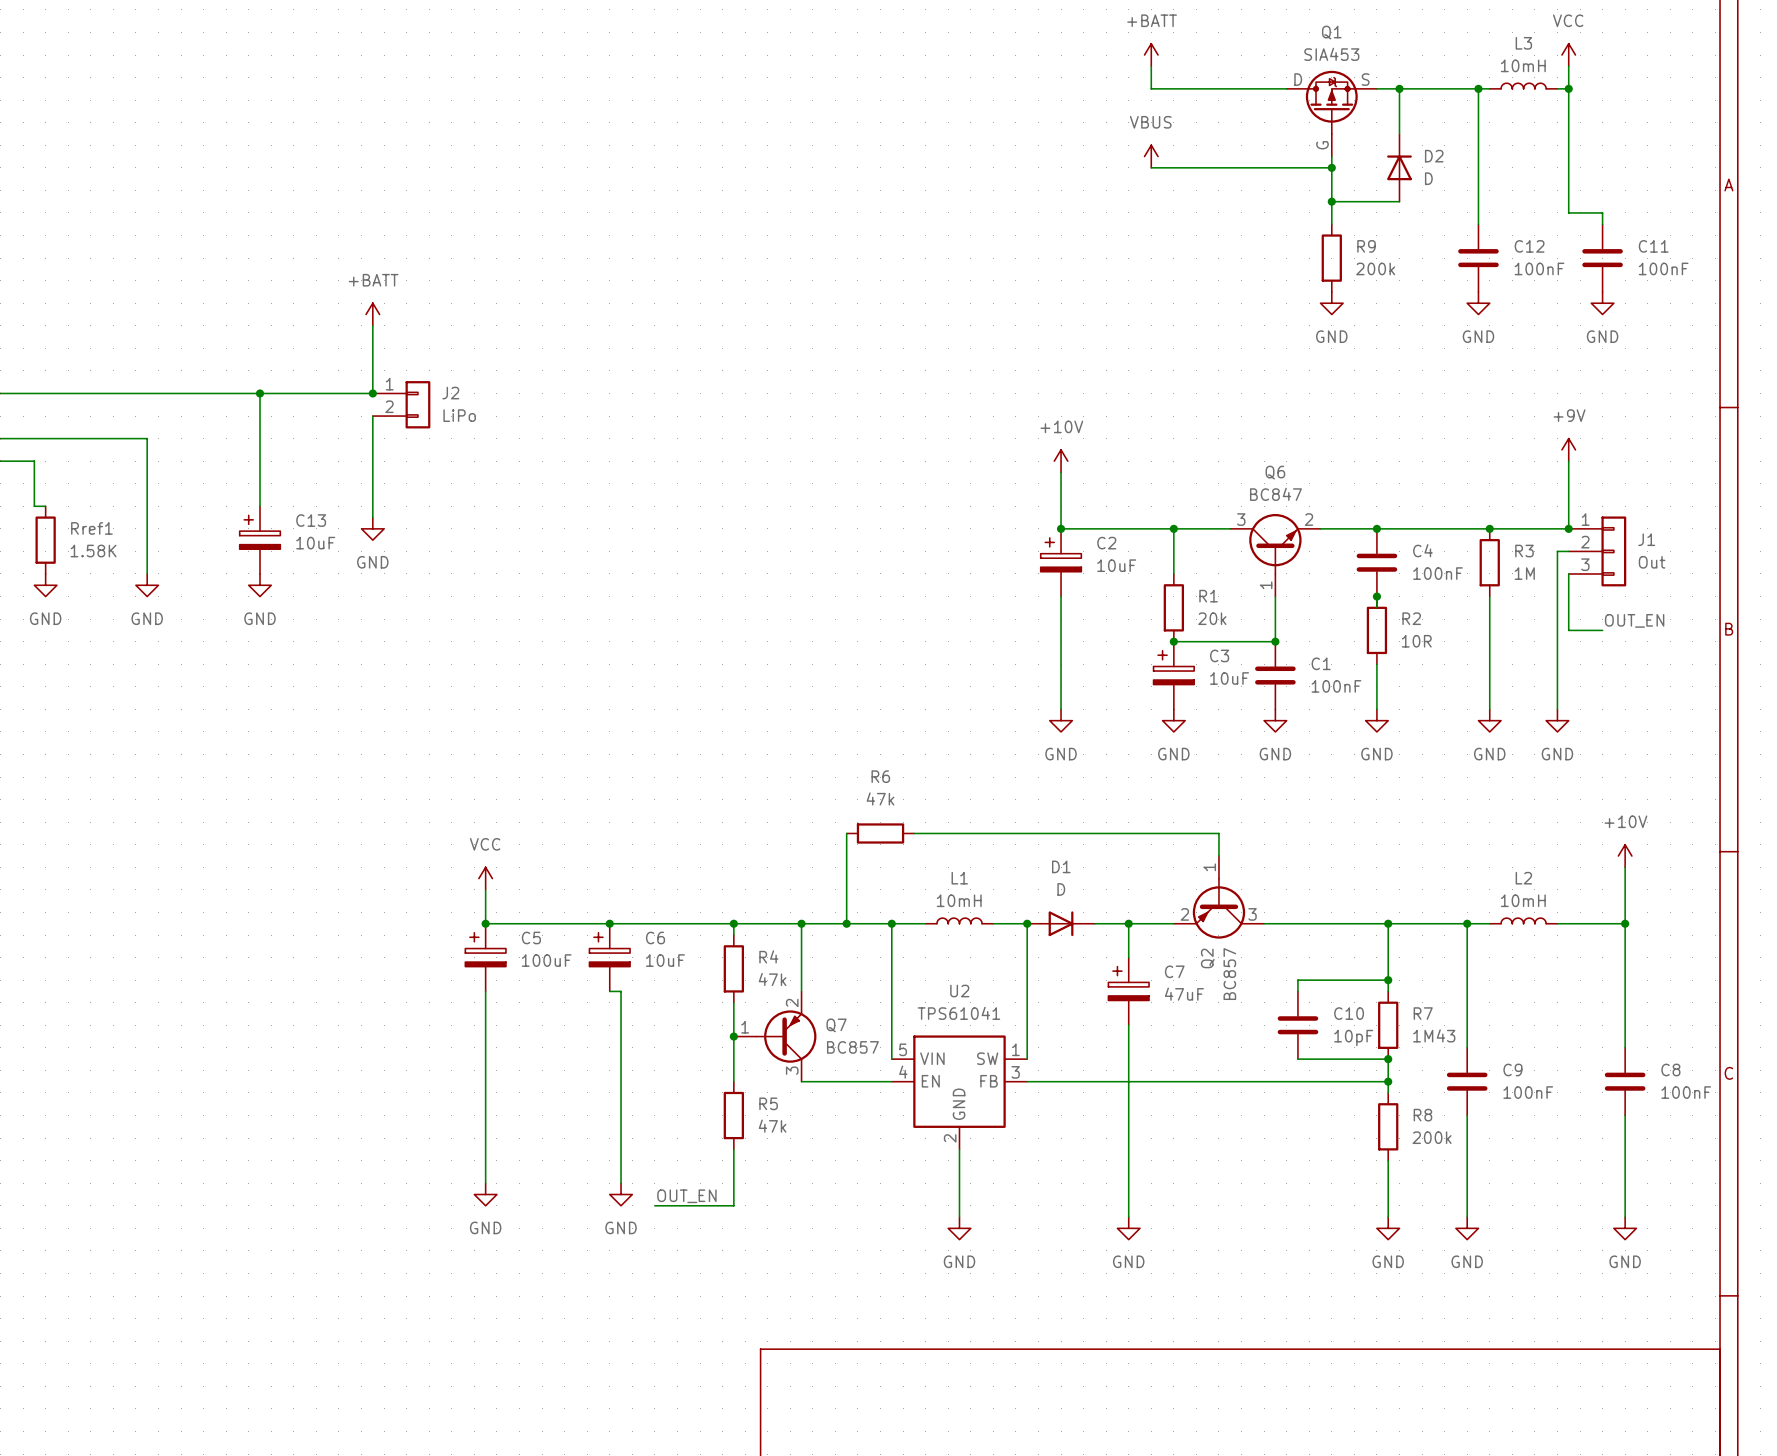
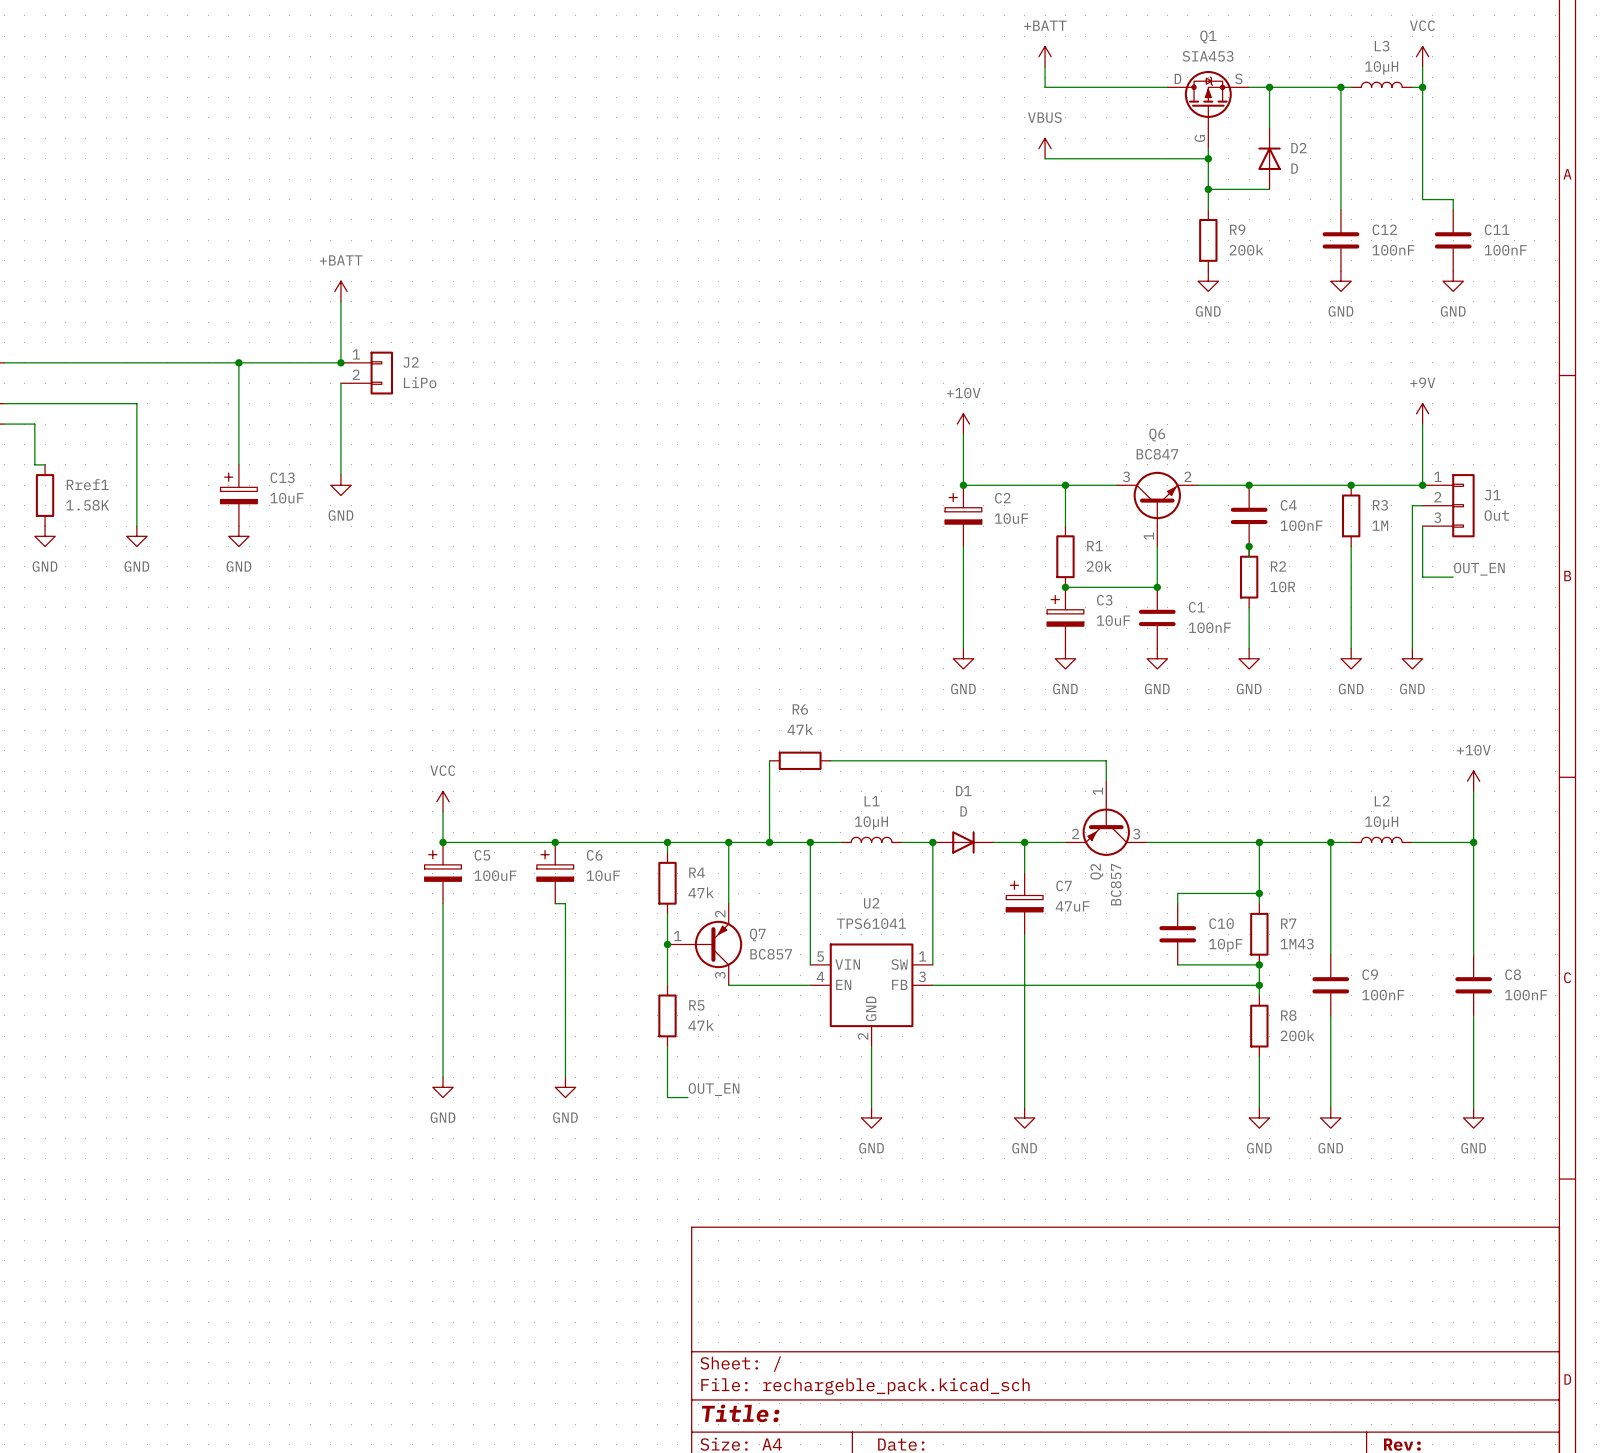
L3 value: 10mH (1523, 65) -> 10µH (1381, 67)
L1 value: 10mH (959, 900) -> 10µH (871, 823)
L2 value: 10mH (1523, 900) -> 10µH (1381, 823)
label position: OUT_EN (686, 1196) -> OUT_EN (714, 1089)
wire: (654, 1205) (733, 1205) -> (687, 1097) (667, 1097)

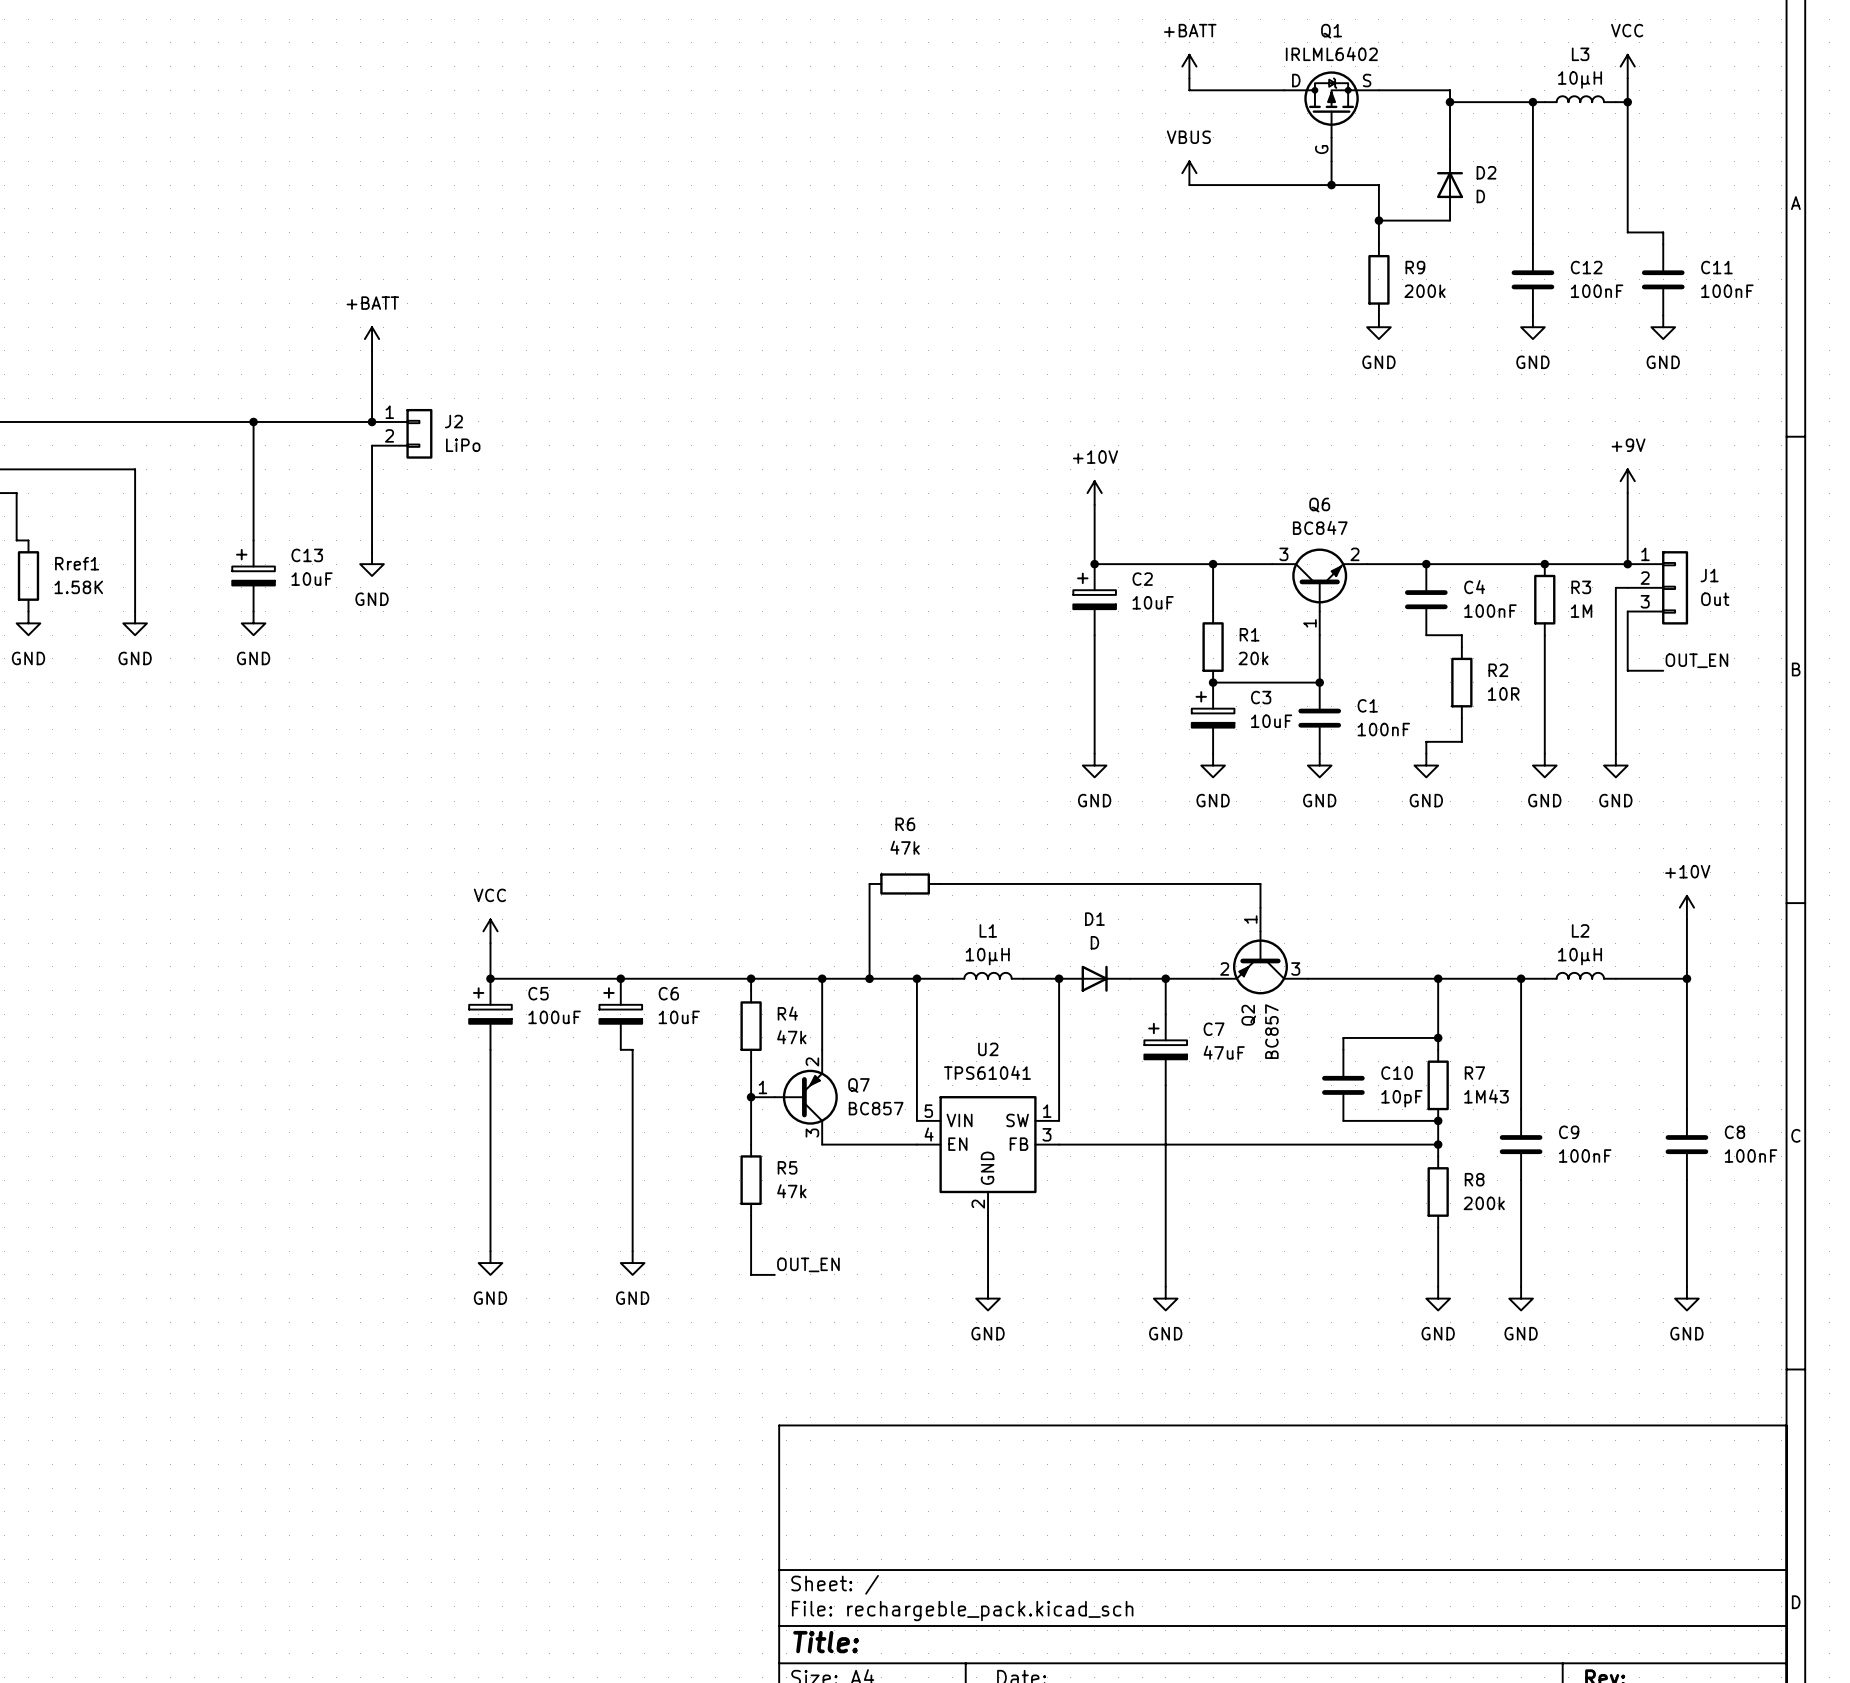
Q1 value: SIA453 (1208, 56) -> IRLML6402 (1331, 54)
wire: (1045, 77) (1045, 87) (1167, 87) -> (1189, 90) (1284, 90)
wire: (1249, 87) (1269, 87) -> (1378, 90) (1450, 90) (1450, 102)
Q1 position: (1208, 109) -> (1331, 116)
wire: none -> (1331, 161) (1331, 185)
wire: (1208, 148) (1208, 158) -> none
junction position: (1208, 158) -> (1331, 185)
wire: (1249, 546) (1249, 556) -> (1426, 635) (1461, 635) (1461, 647)
junction: (1249, 546) -> none
R2 position: (1249, 577) -> (1461, 682)
wire: (1249, 607) (1249, 638) -> (1461, 718) (1461, 741) (1426, 741)

